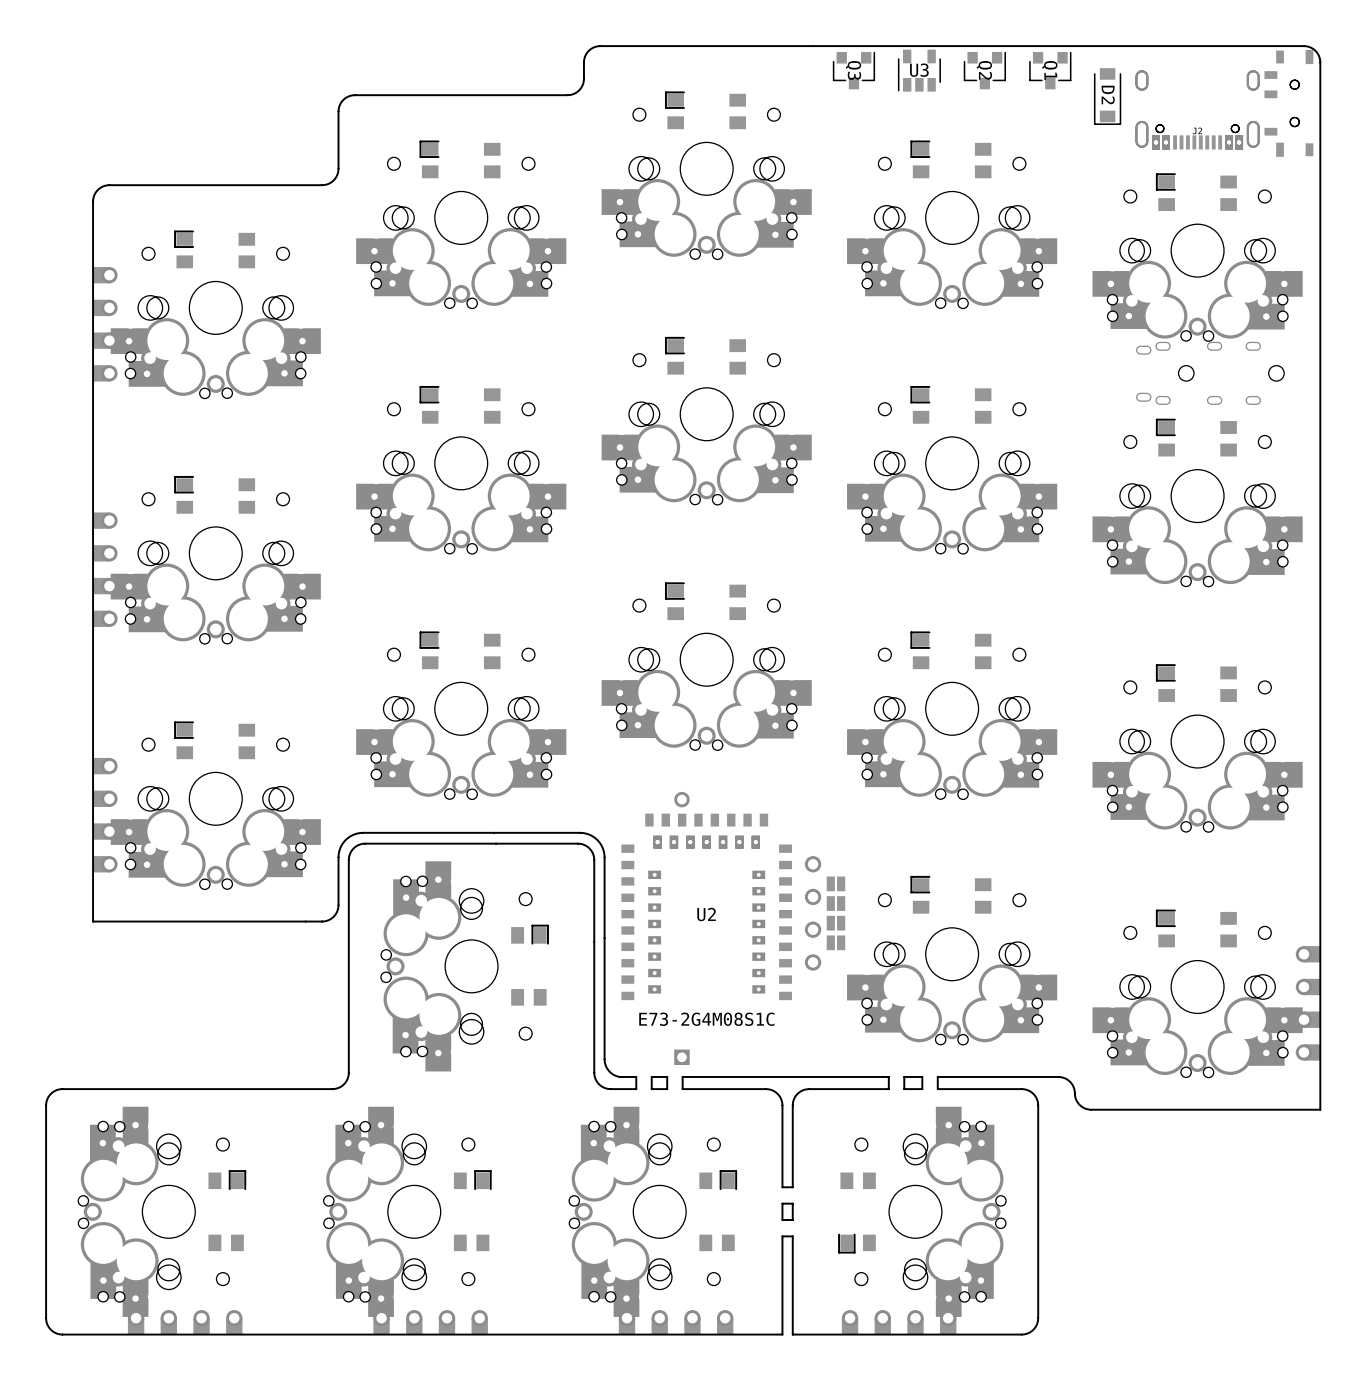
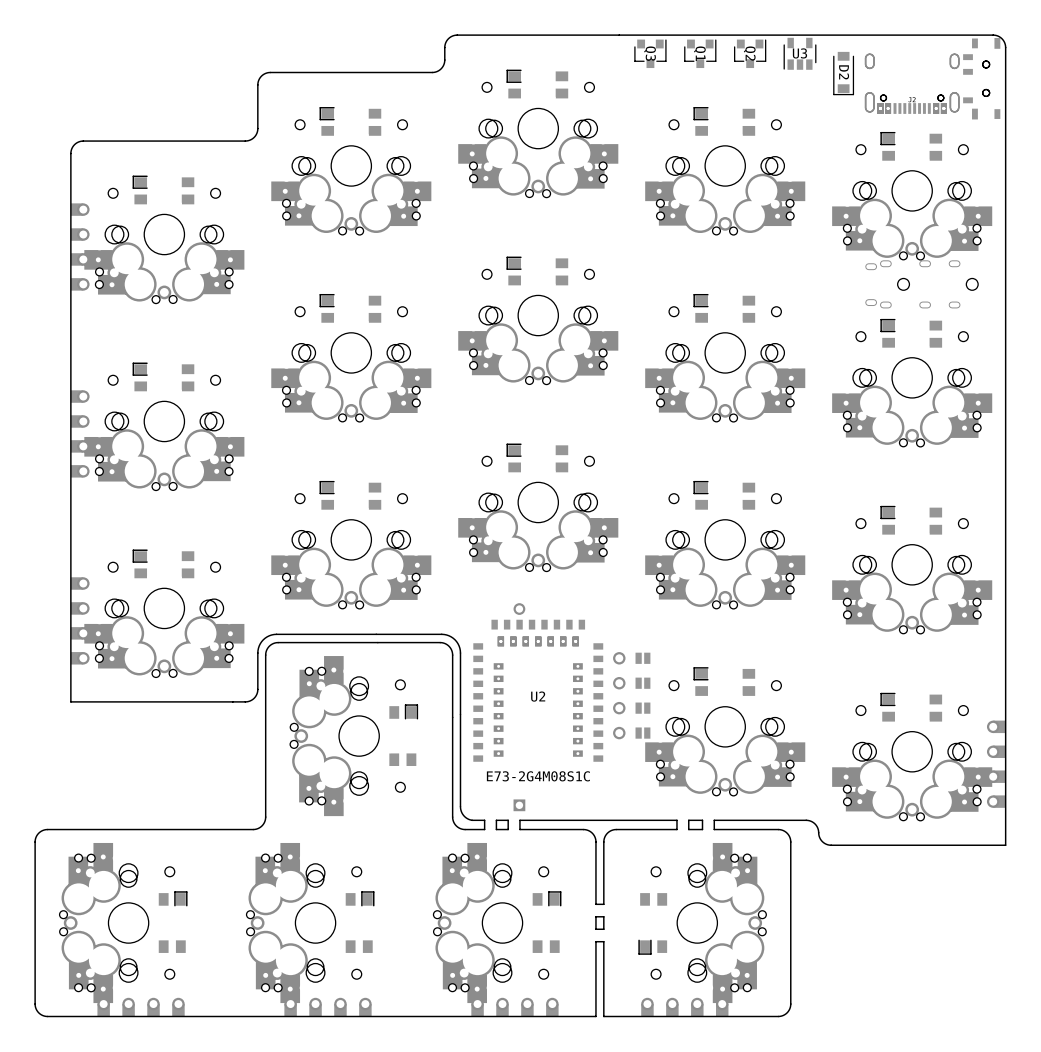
U3 position: (919, 70) -> (800, 53)
Q1 position: (1050, 70) -> (700, 53)
part: none -> (642, 658)
part: (835, 883) -> none
part: none -> (642, 683)
part: (835, 903) -> none
part: (835, 923) -> none
part: none -> (642, 708)
part: (835, 942) -> none
part: none -> (642, 733)

